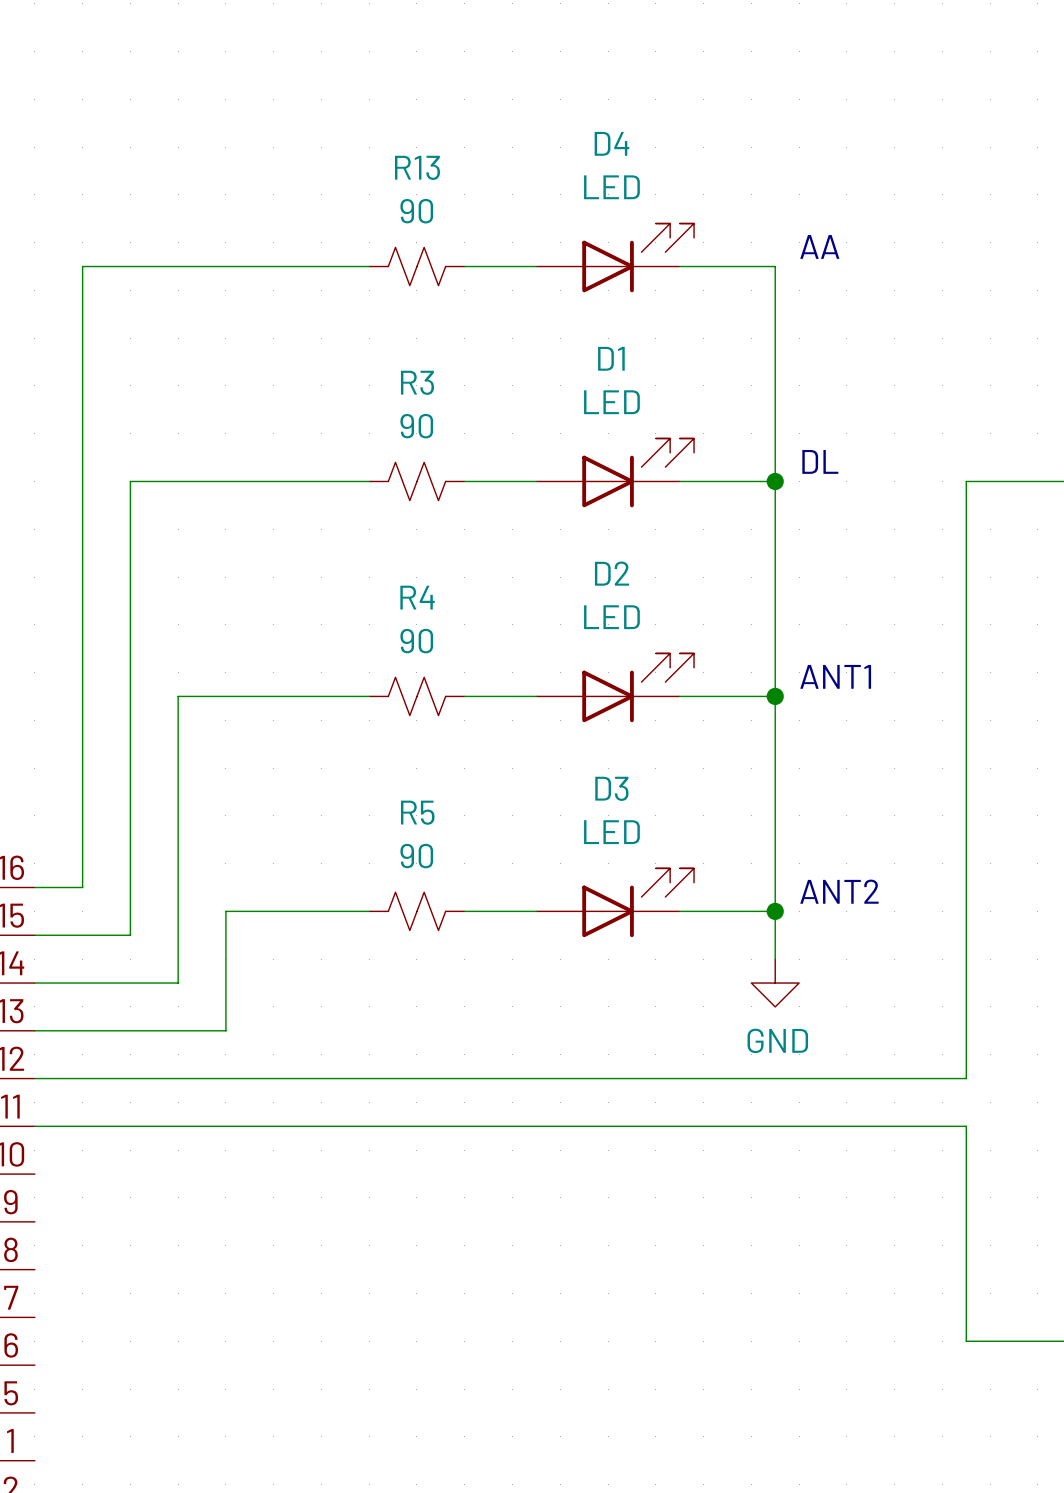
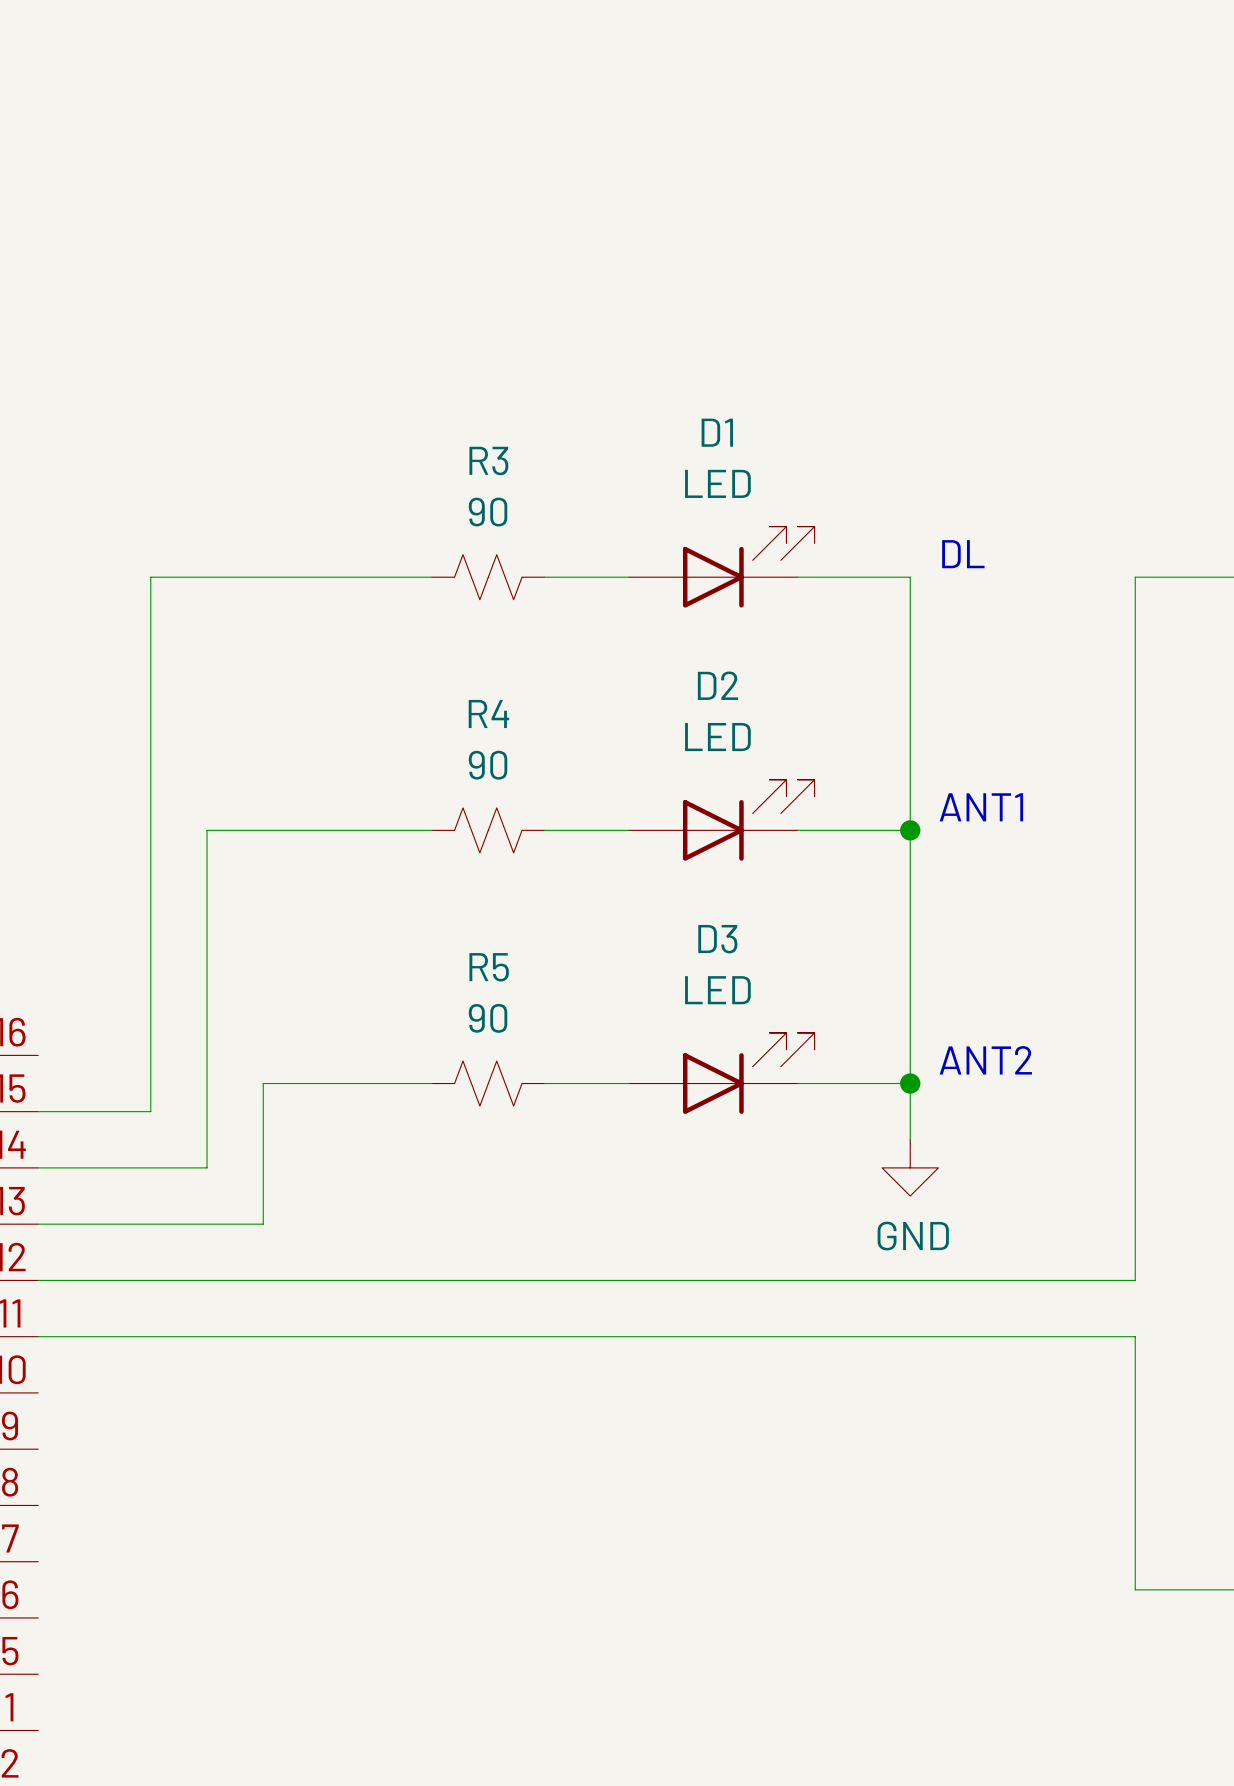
text: AA (819, 246) -> none
D4: LED (615, 257) -> none
wire: (369, 266) (82, 266) (82, 887) (34, 887) -> none
R13: 90 (416, 266) -> none
wire: (464, 266) (536, 266) -> none
wire: (679, 266) (775, 266) (775, 481) -> none
junction: (775, 481) -> none

